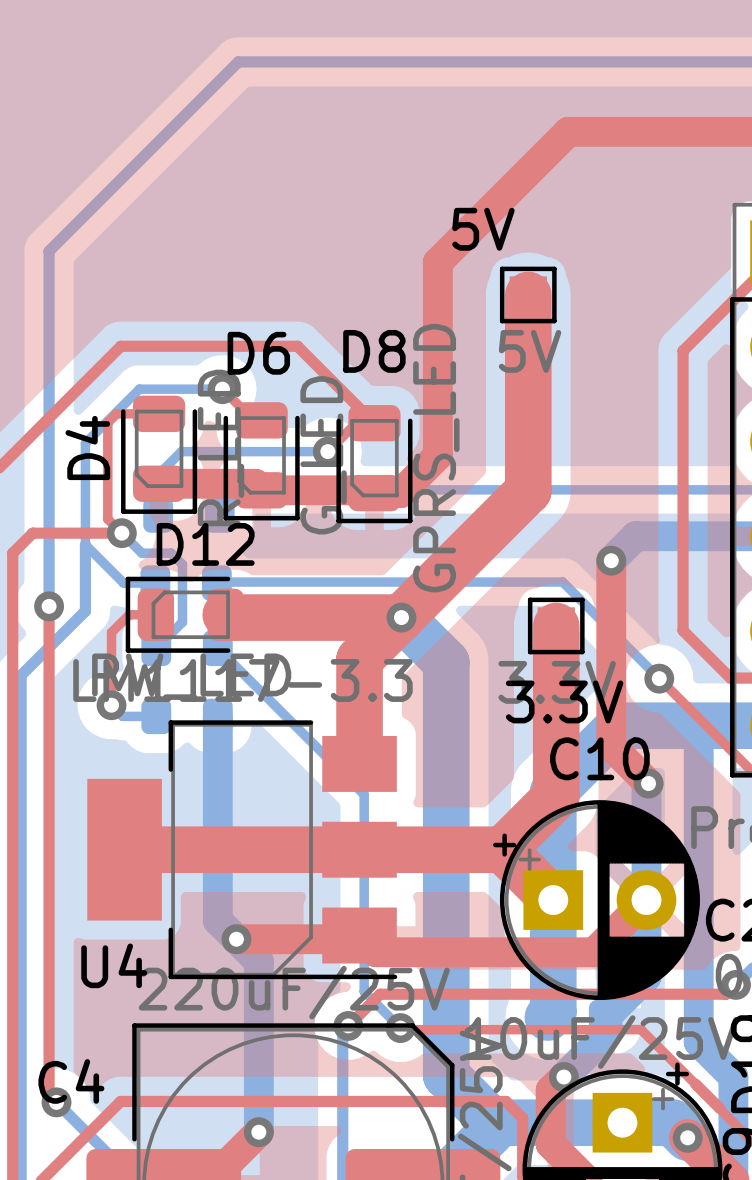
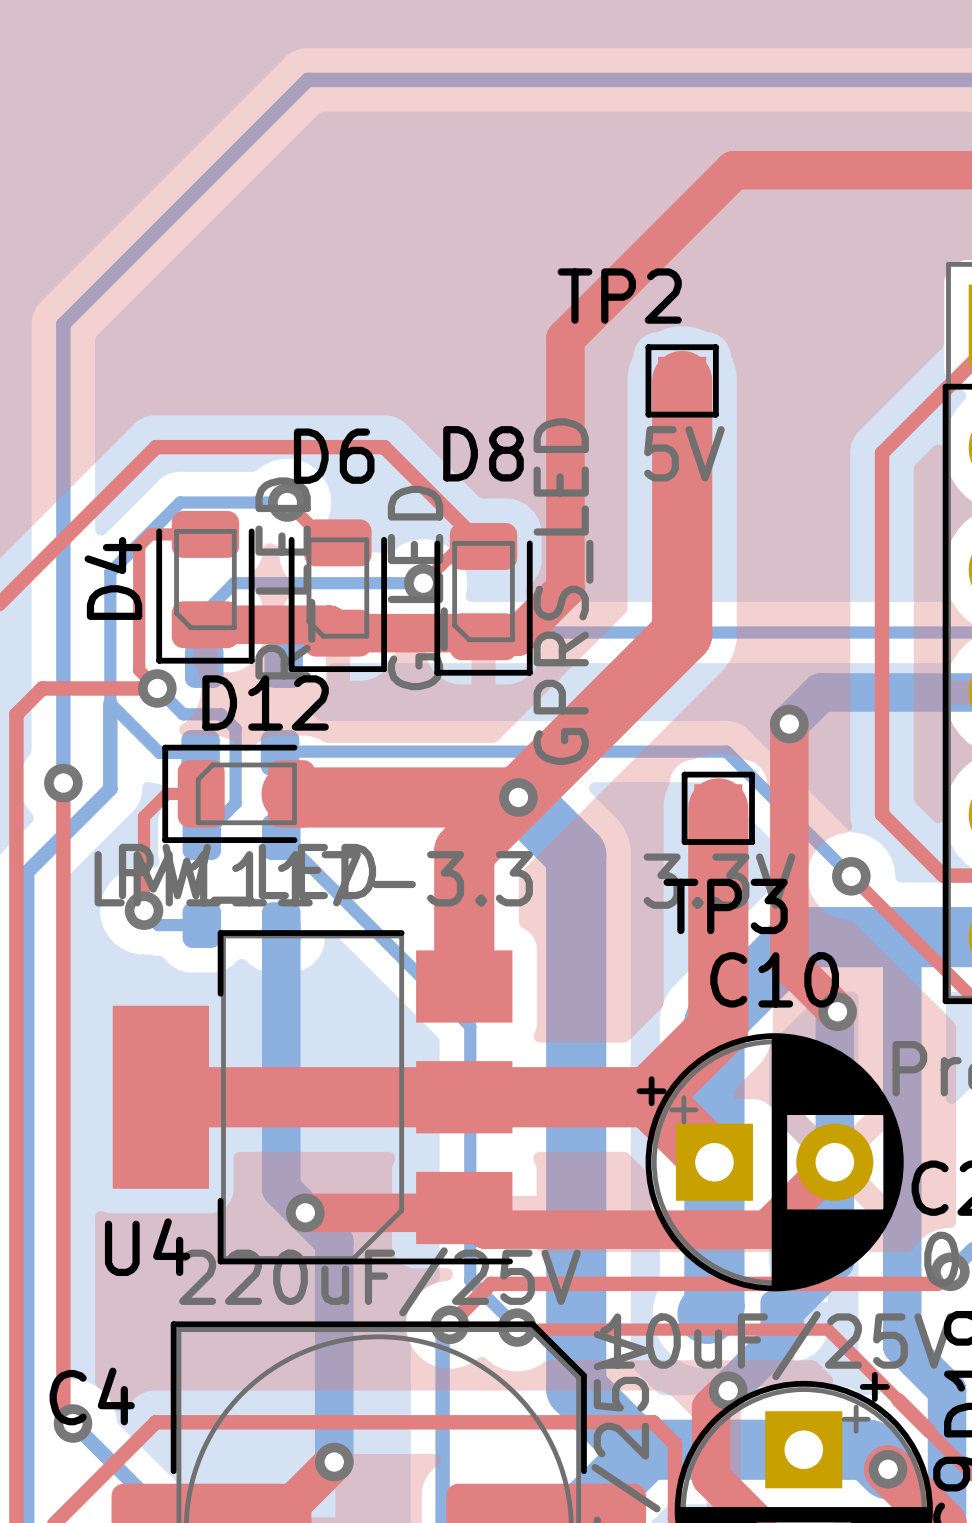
5V name: 5V (483, 229) -> TP2 (619, 296)
3.3V name: 3.3V (564, 701) -> TP3 (725, 906)

